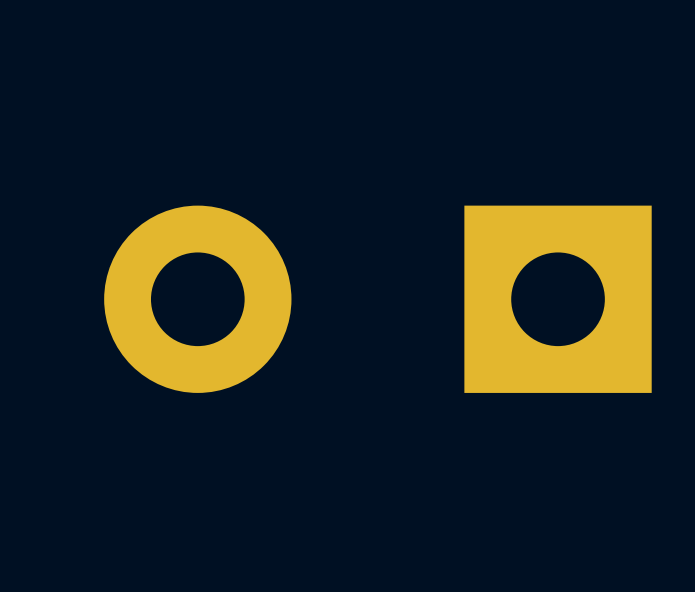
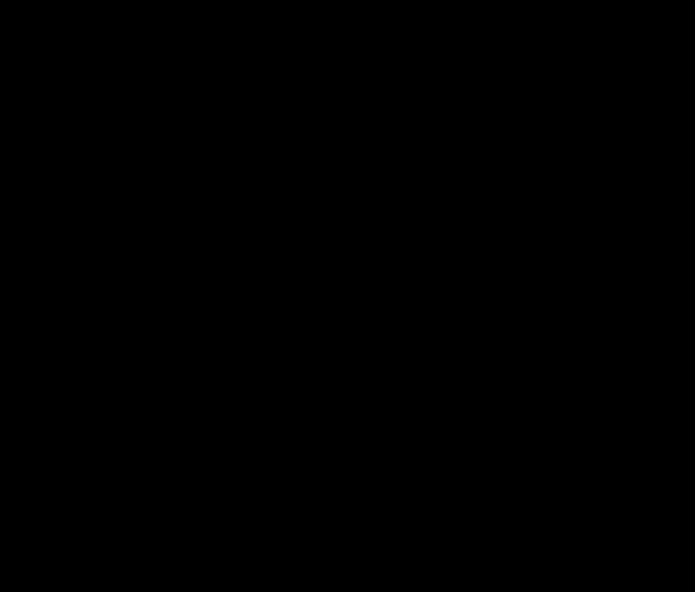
part: (377, 299) -> none

